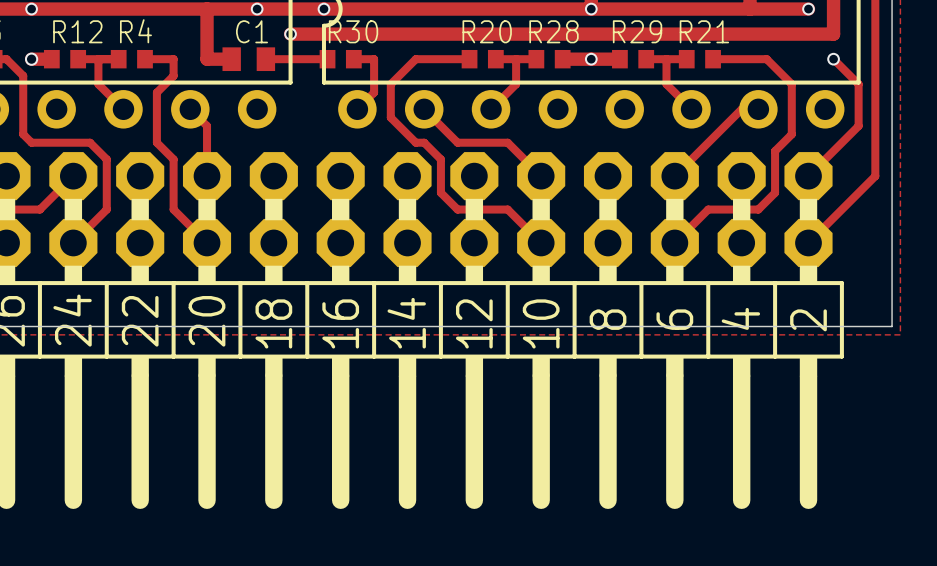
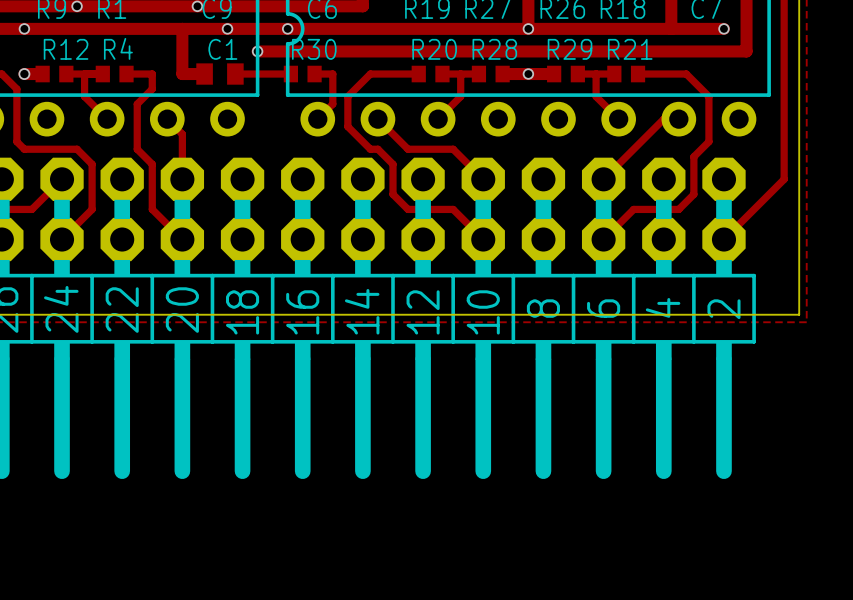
track: (833, 59) (858, 84) (858, 126) (808, 176) -> none
via: (833, 59) -> none

